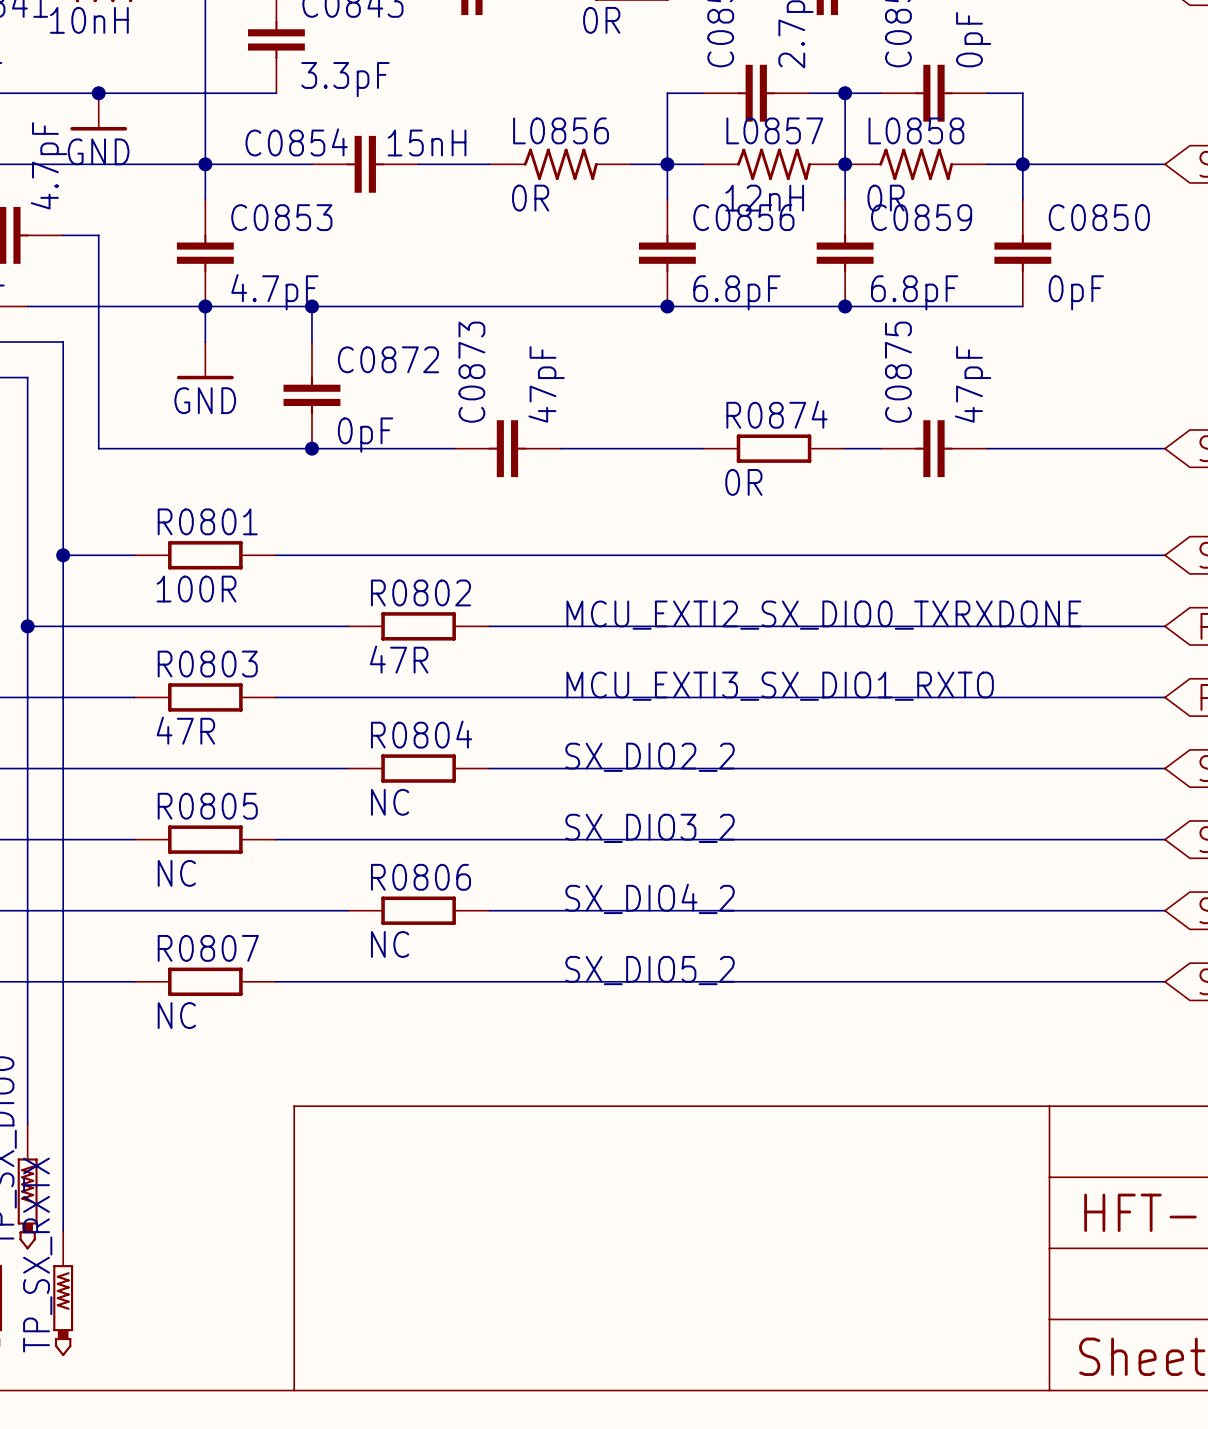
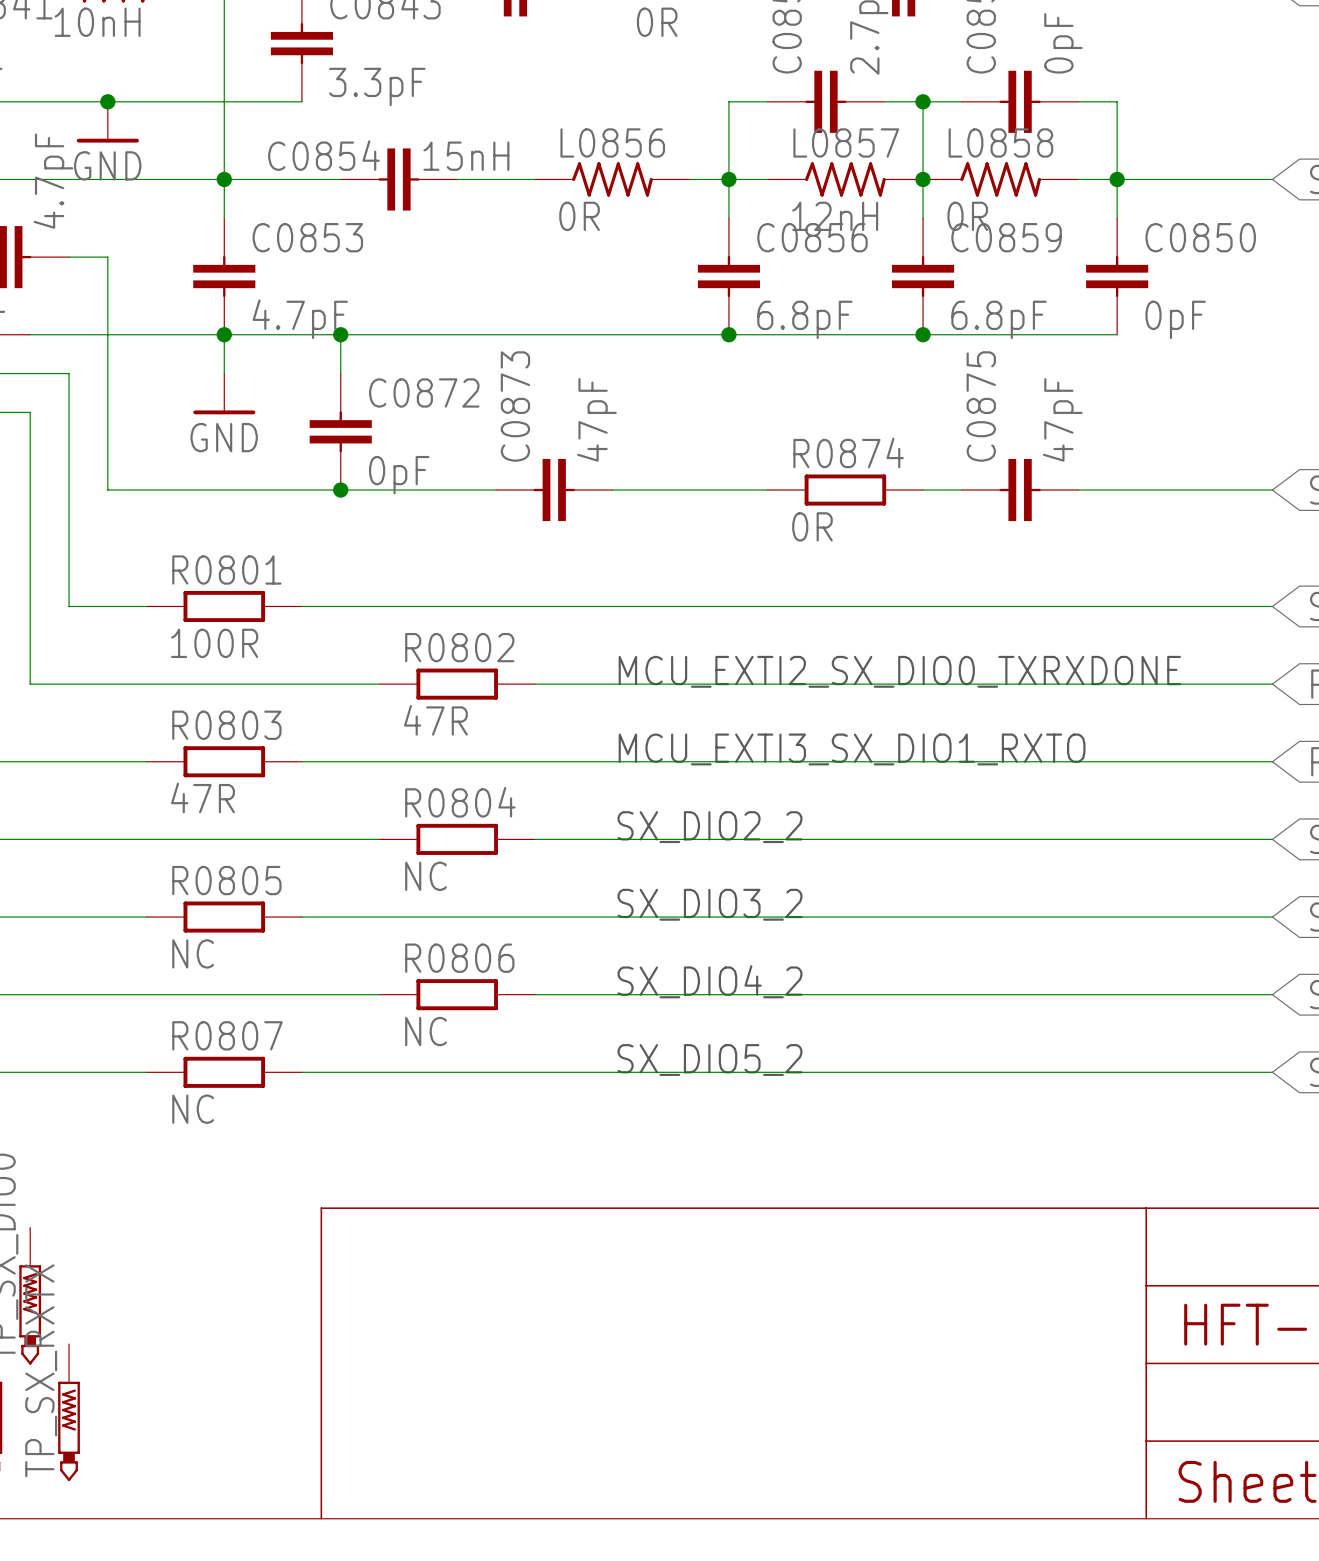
wire: (63, 555) (63, 1230) -> none
junction: (63, 555) -> none
wire: (27, 626) (27, 1123) -> none
junction: (27, 626) -> none

